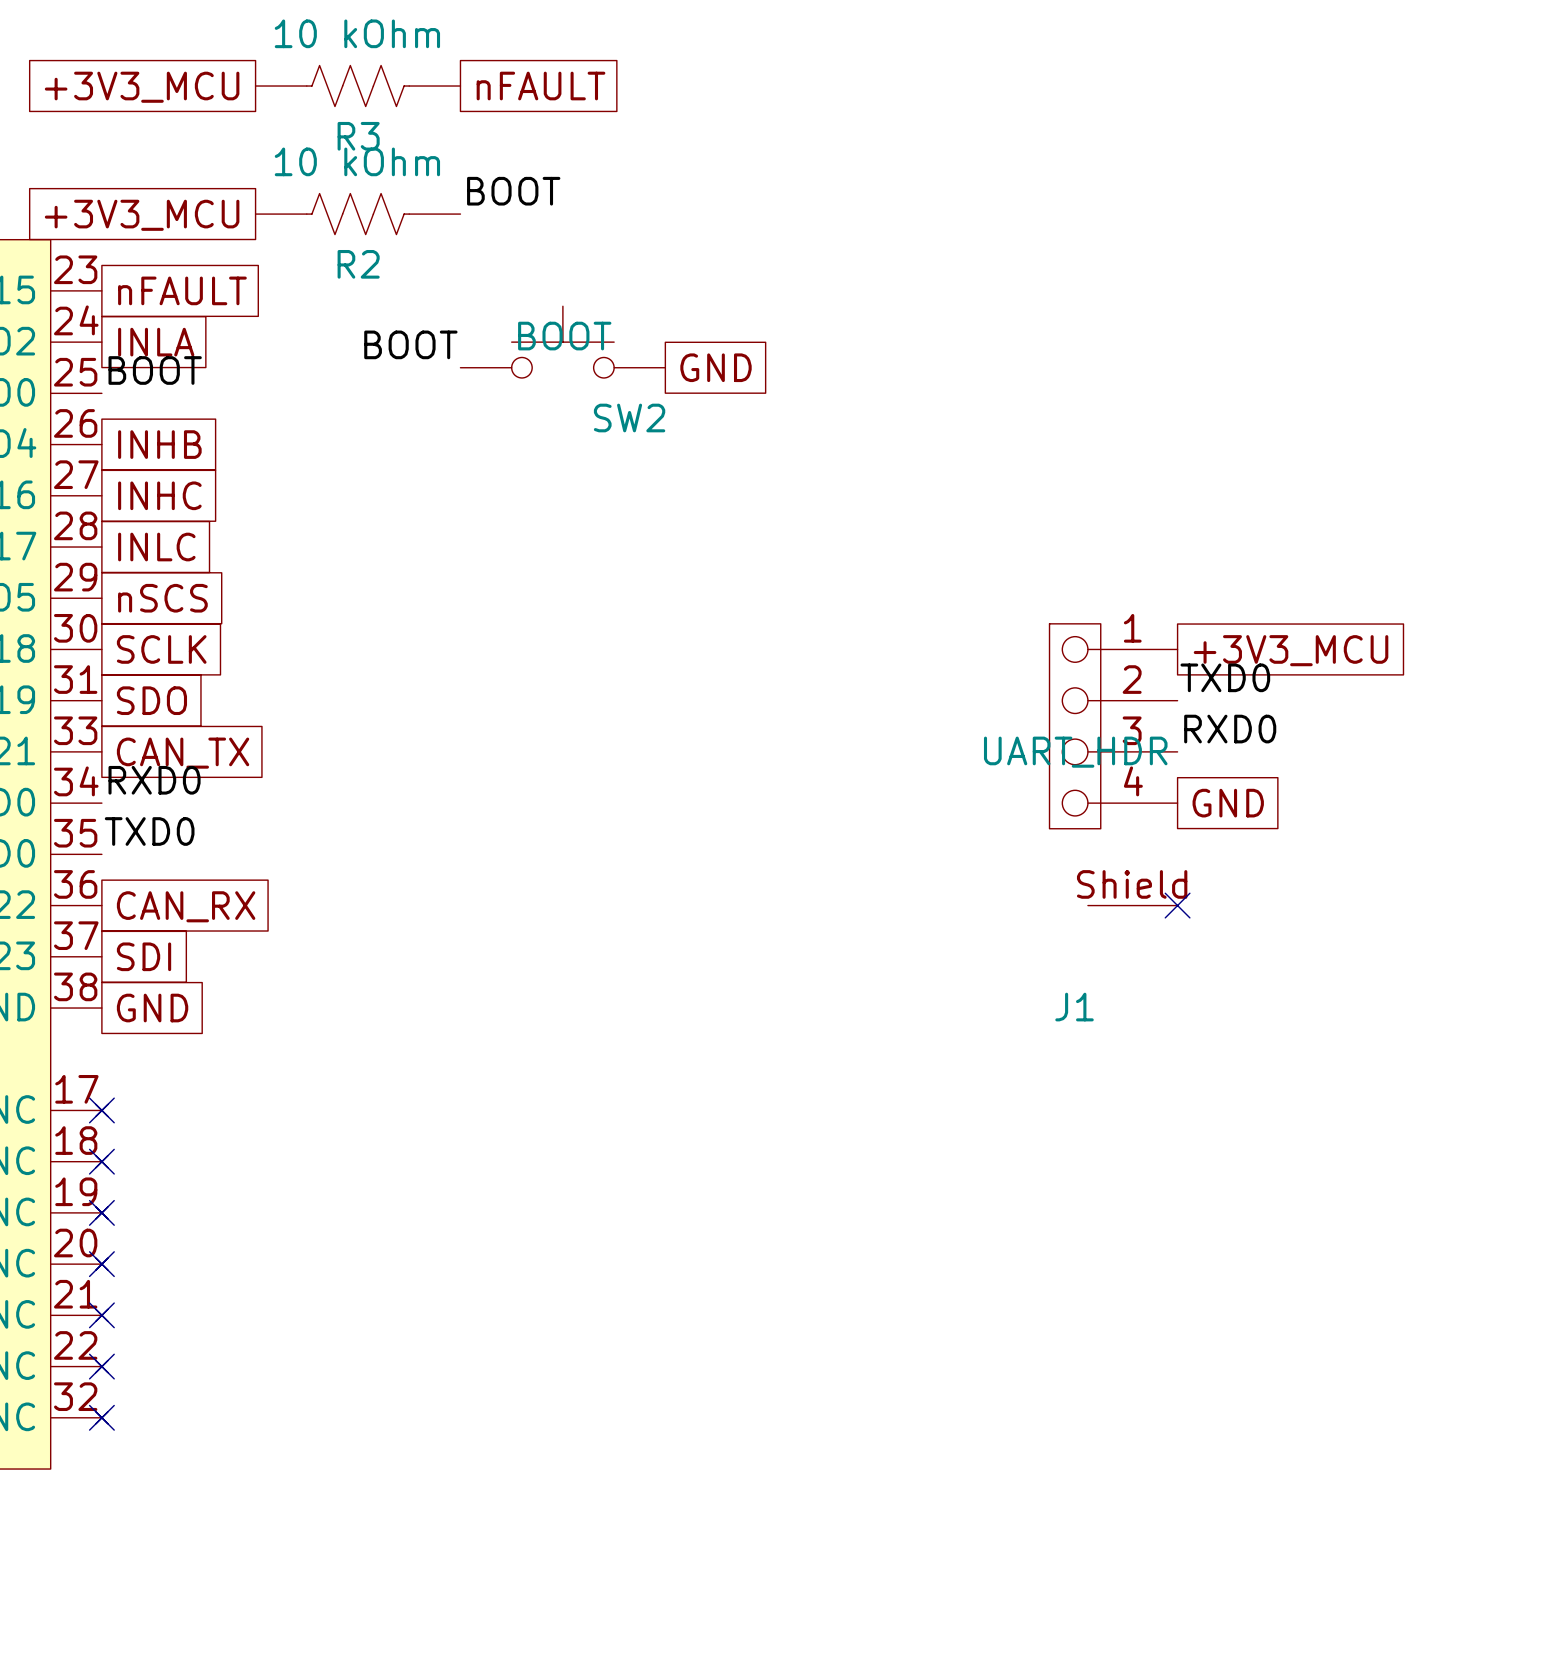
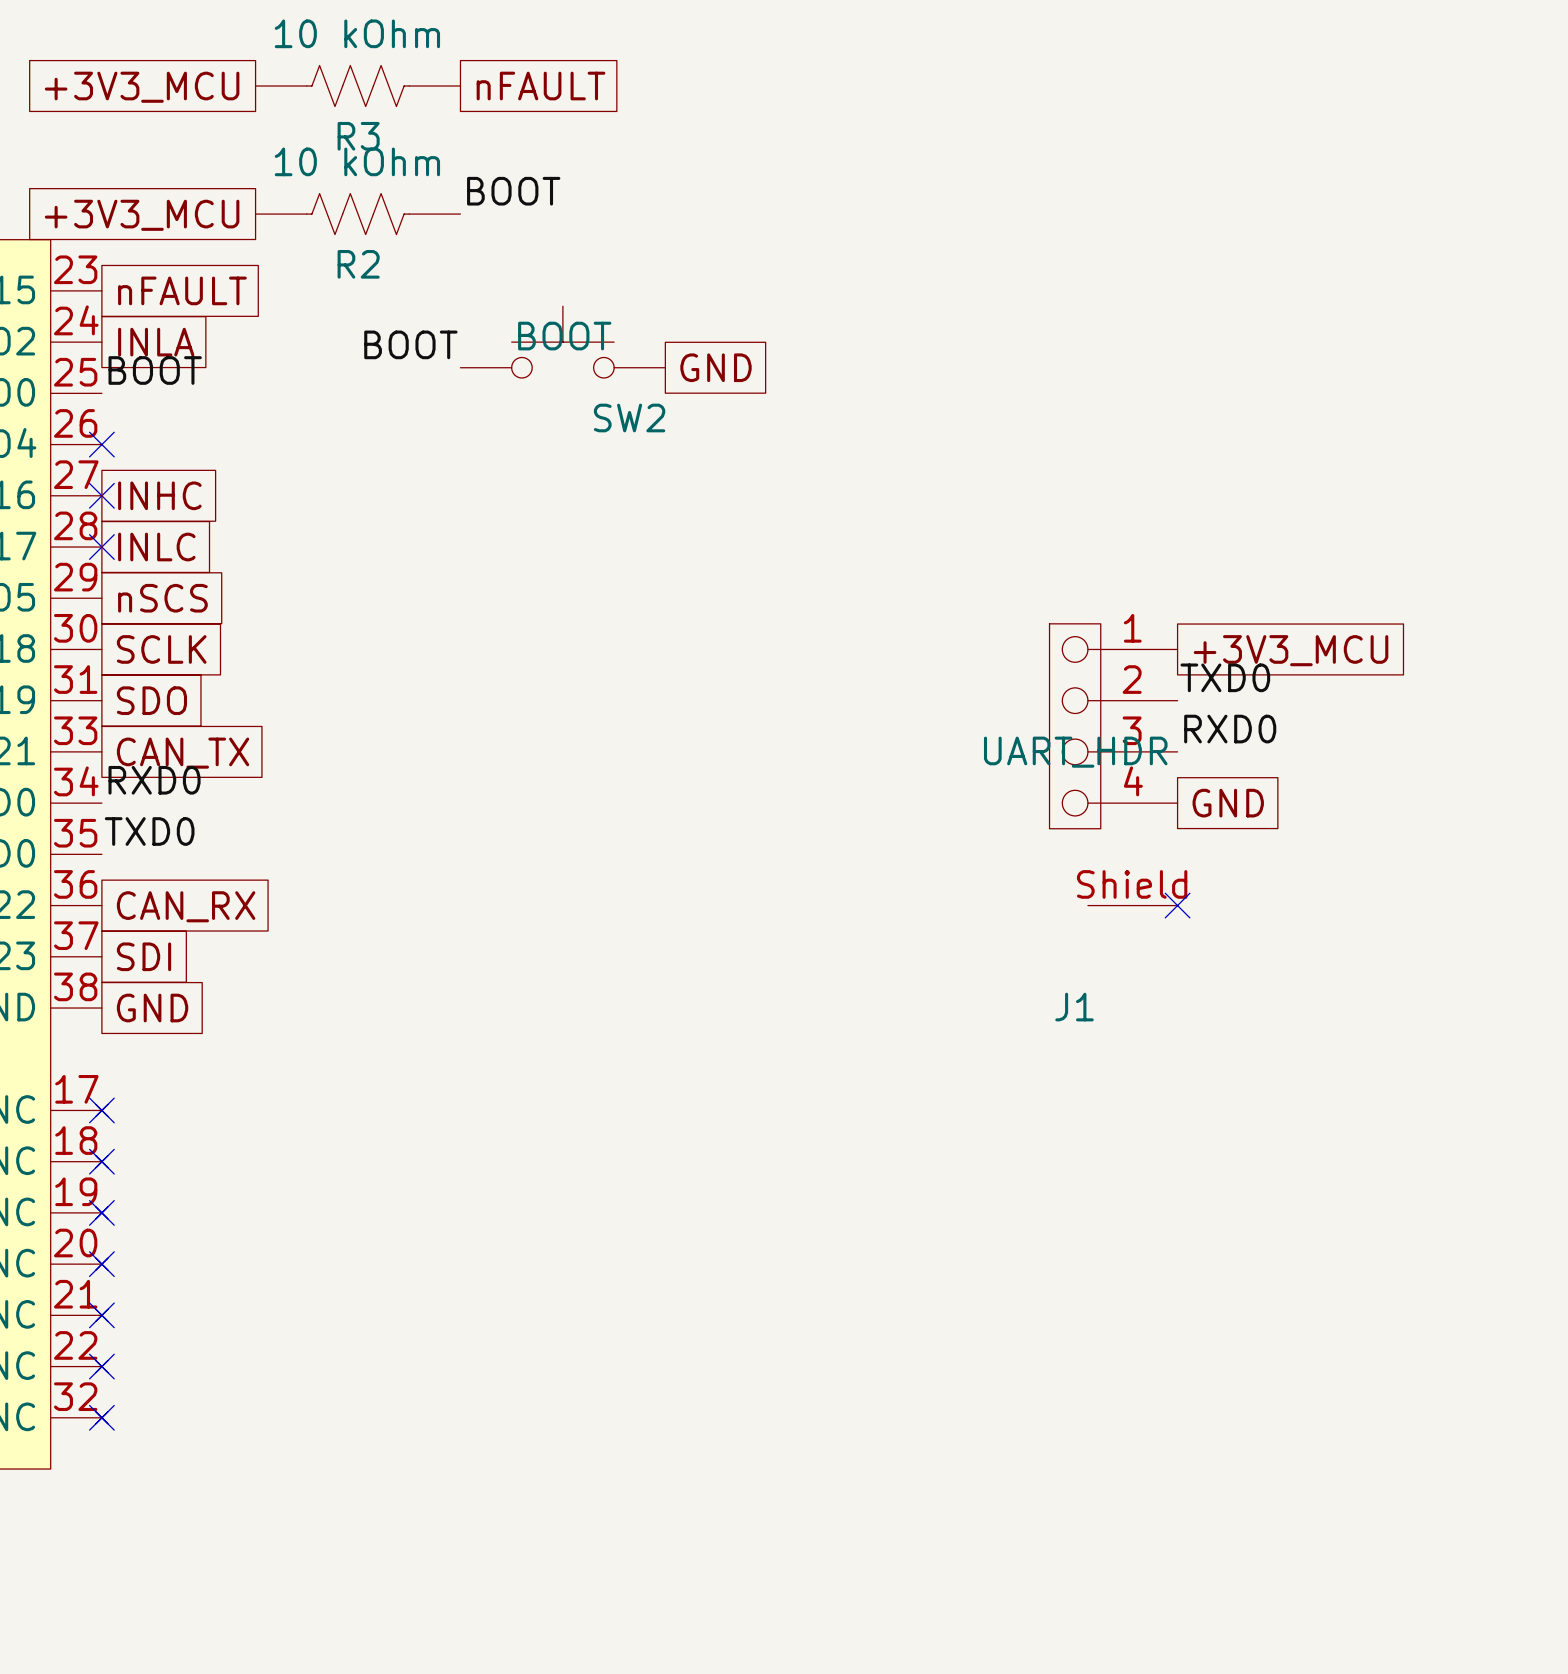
no-connect mark: none -> (101, 444)
global label: INHB (159, 444) -> none
no-connect mark: none -> (101, 495)
no-connect mark: none -> (101, 547)

